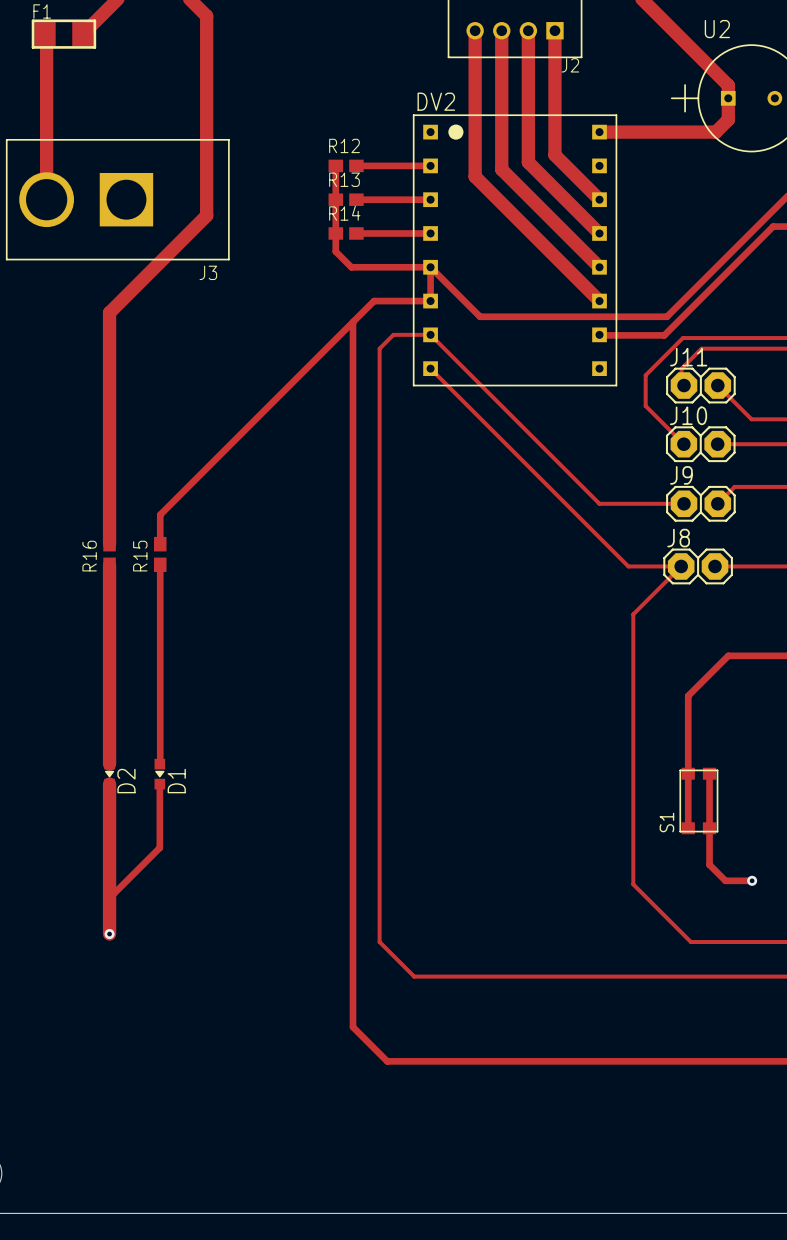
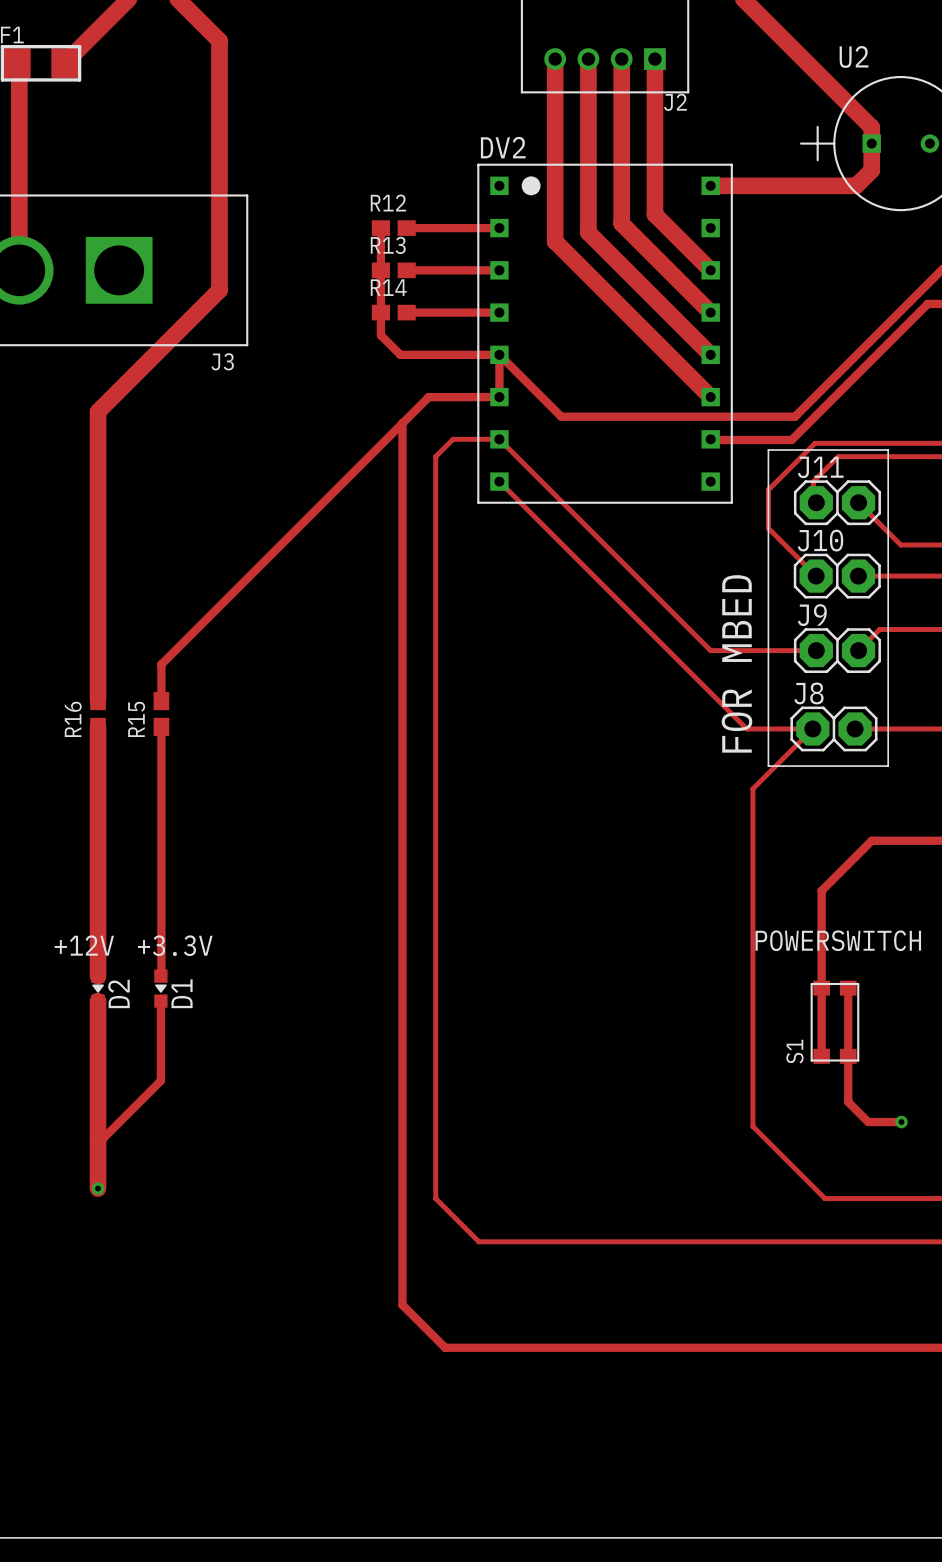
line: none -> (768, 450) (768, 766) (888, 766) (888, 450) (768, 450)
text: none -> FOR MBED (736, 663)
text: none -> POWERSWITCH (838, 940)
text: none -> +12V (84, 945)
text: none -> +3.3V (175, 945)

